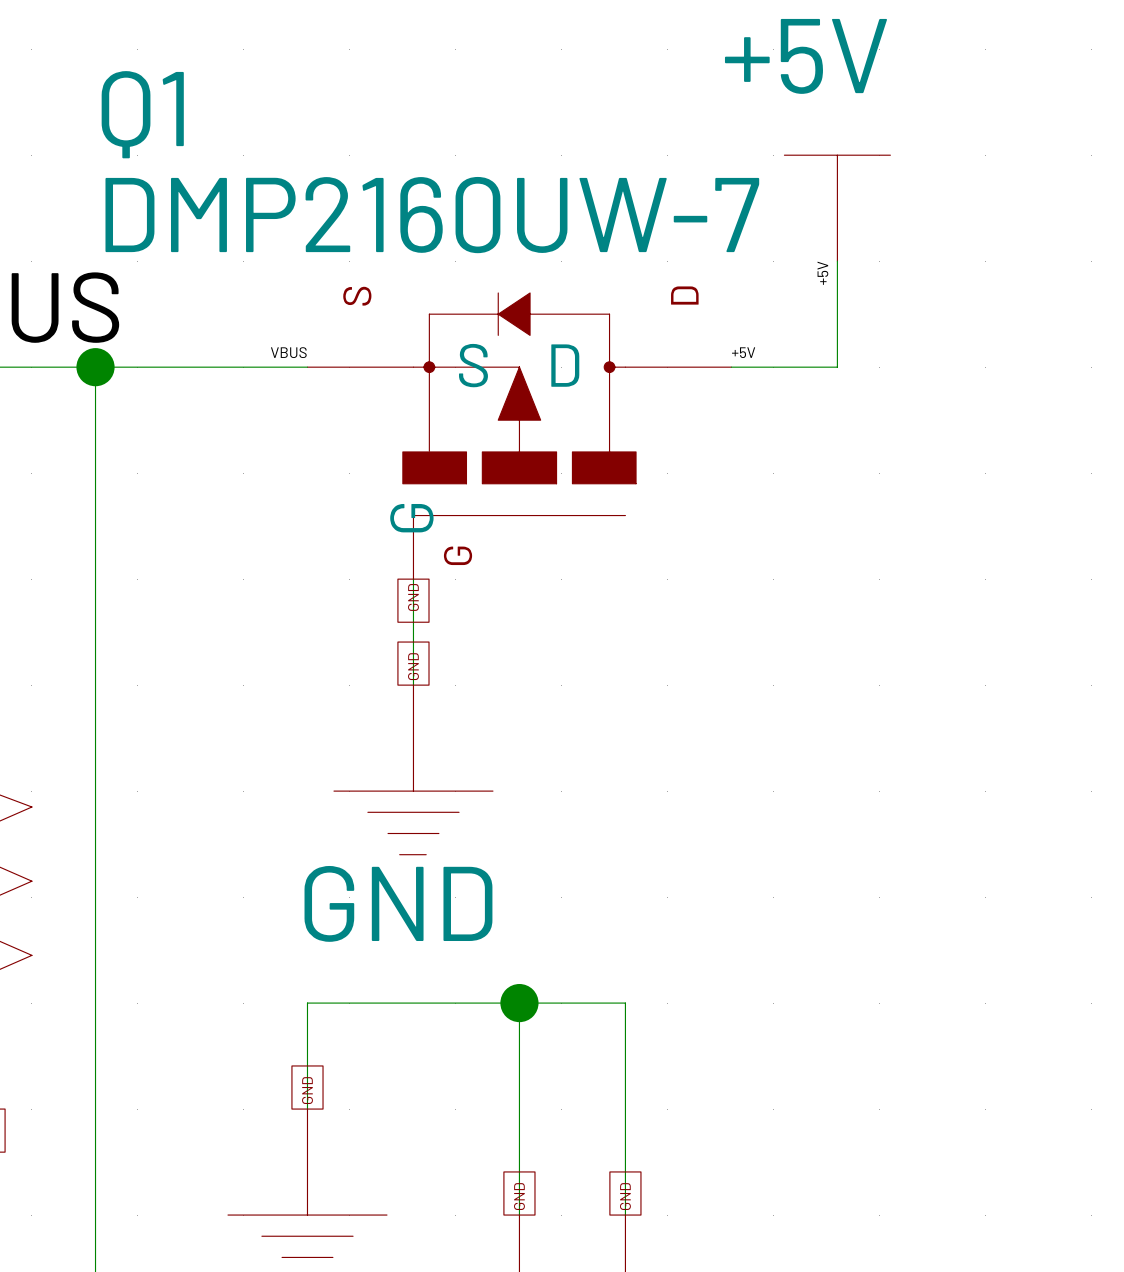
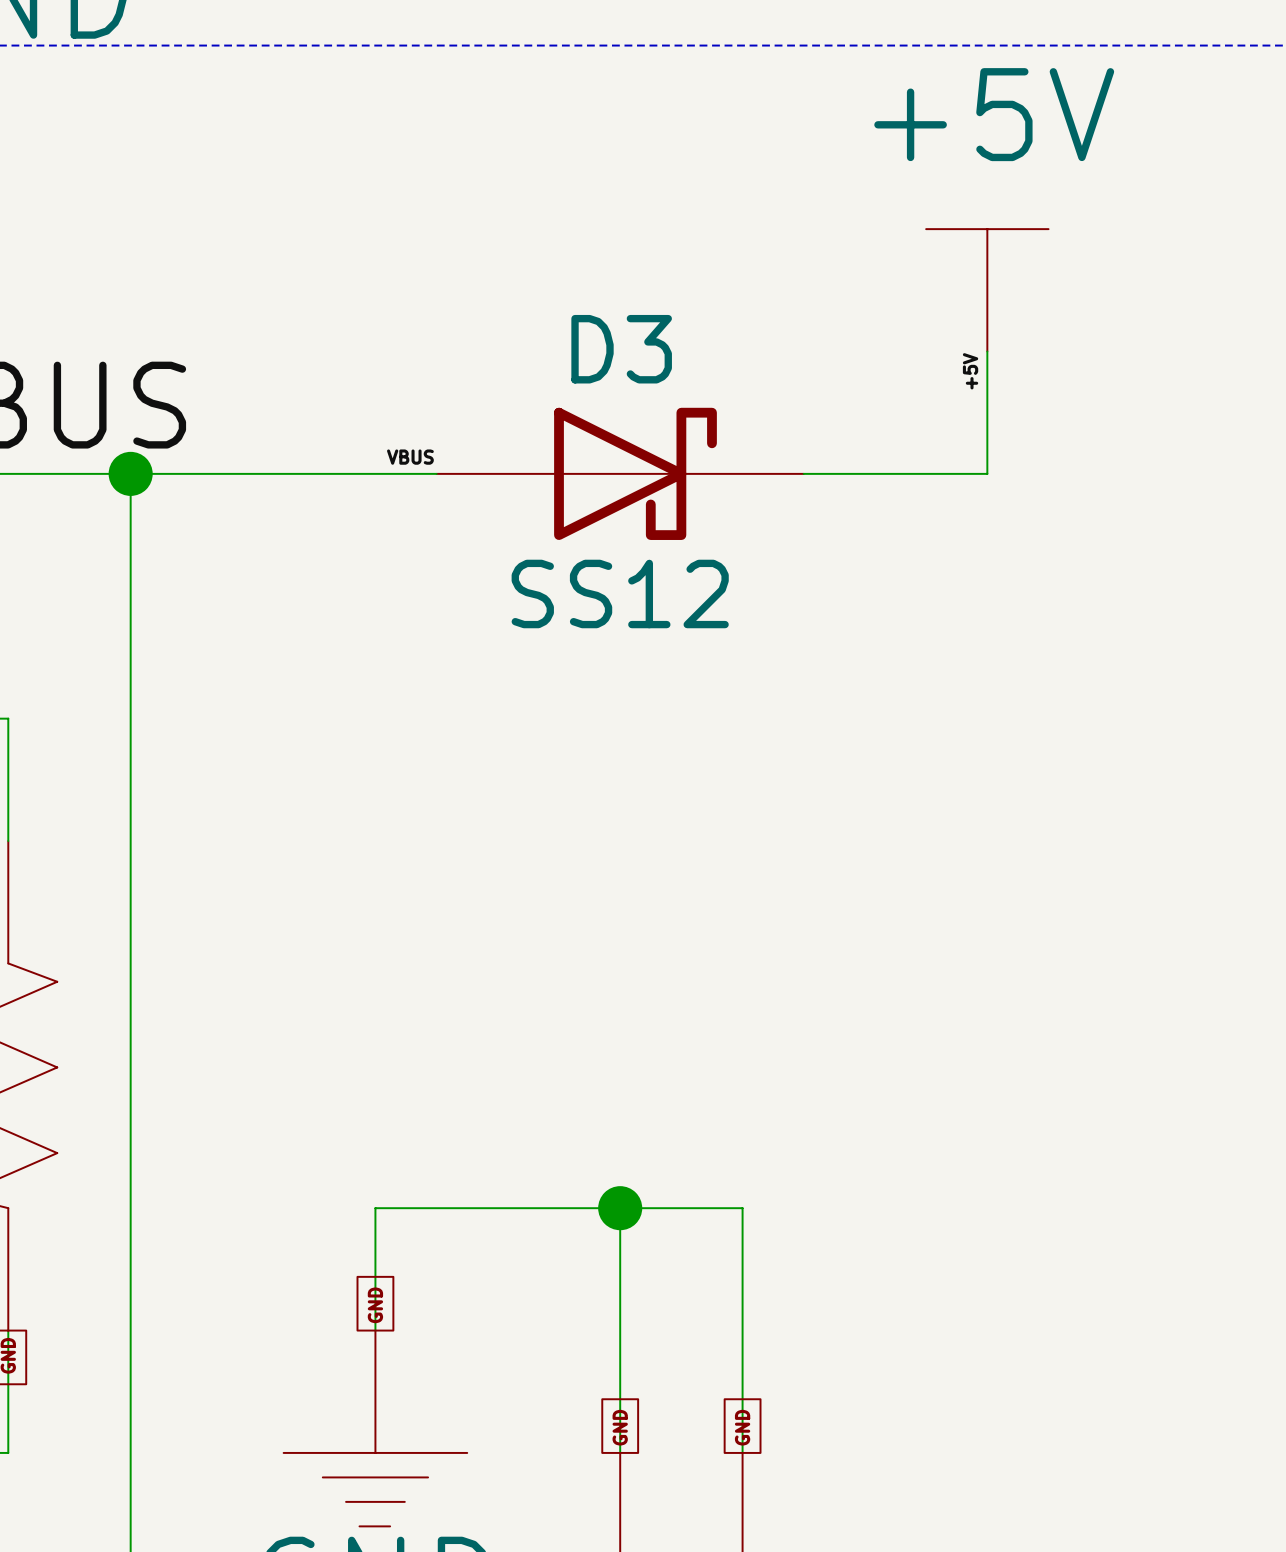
label position: VBUS (288, 352) -> VBUS (410, 457)
label: +5V (743, 352) -> none
D3: none -> SS12 (620, 473)
Q1: DMP2160UW-7 (519, 436) -> none
wire: (413, 579) (413, 685) -> none
global label: GND (413, 597) -> none
global label: GND (413, 666) -> none
power symbol: GND (413, 769) -> none

